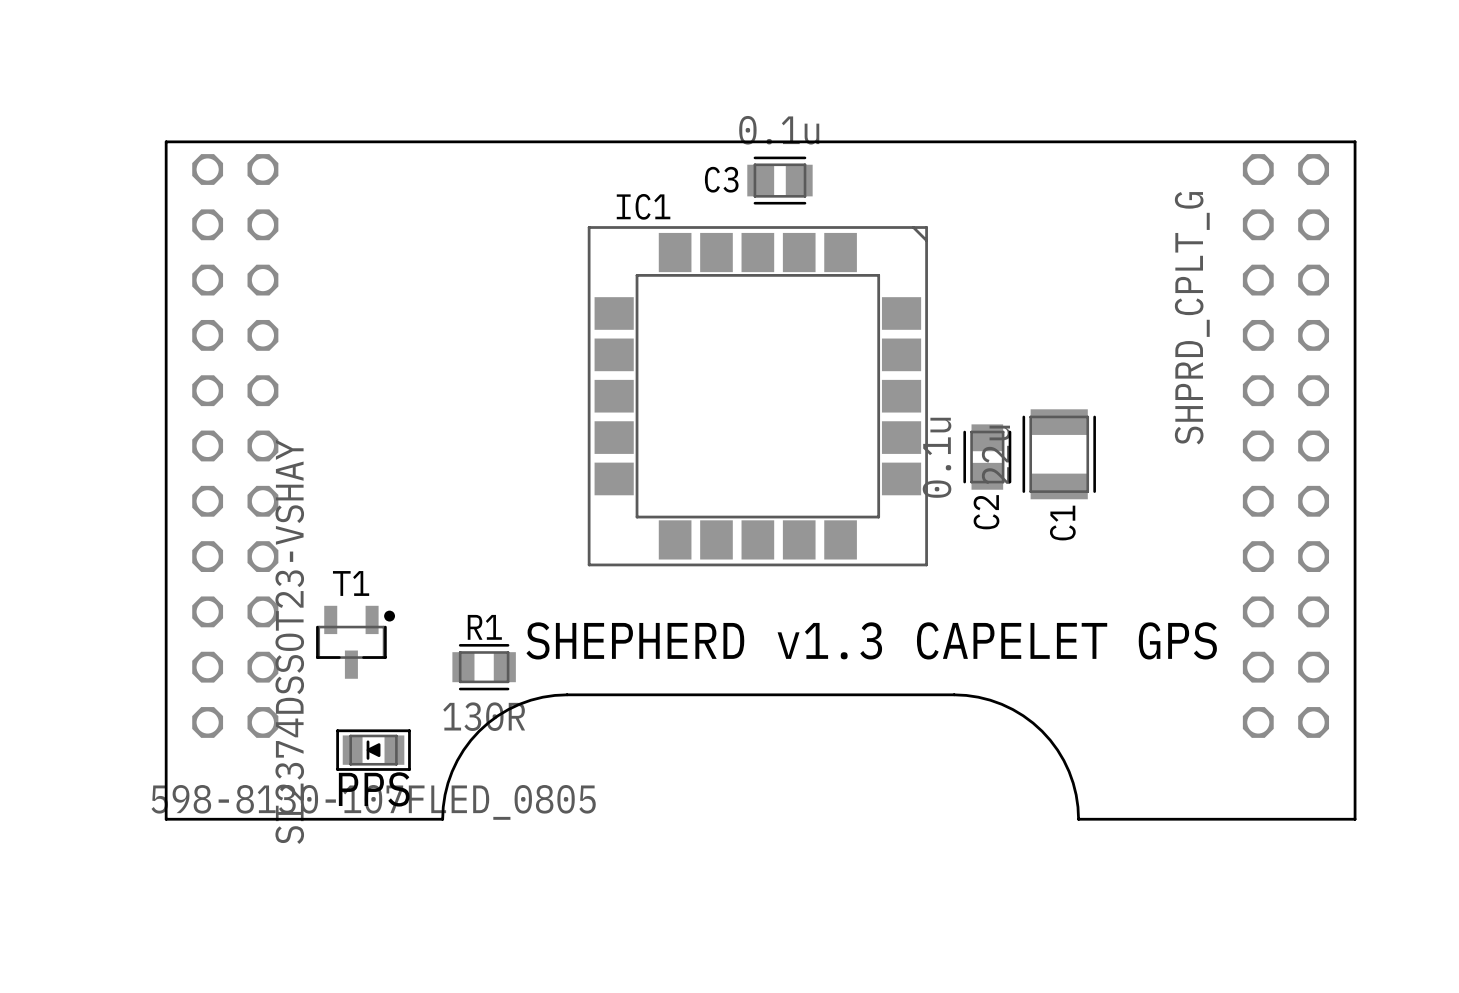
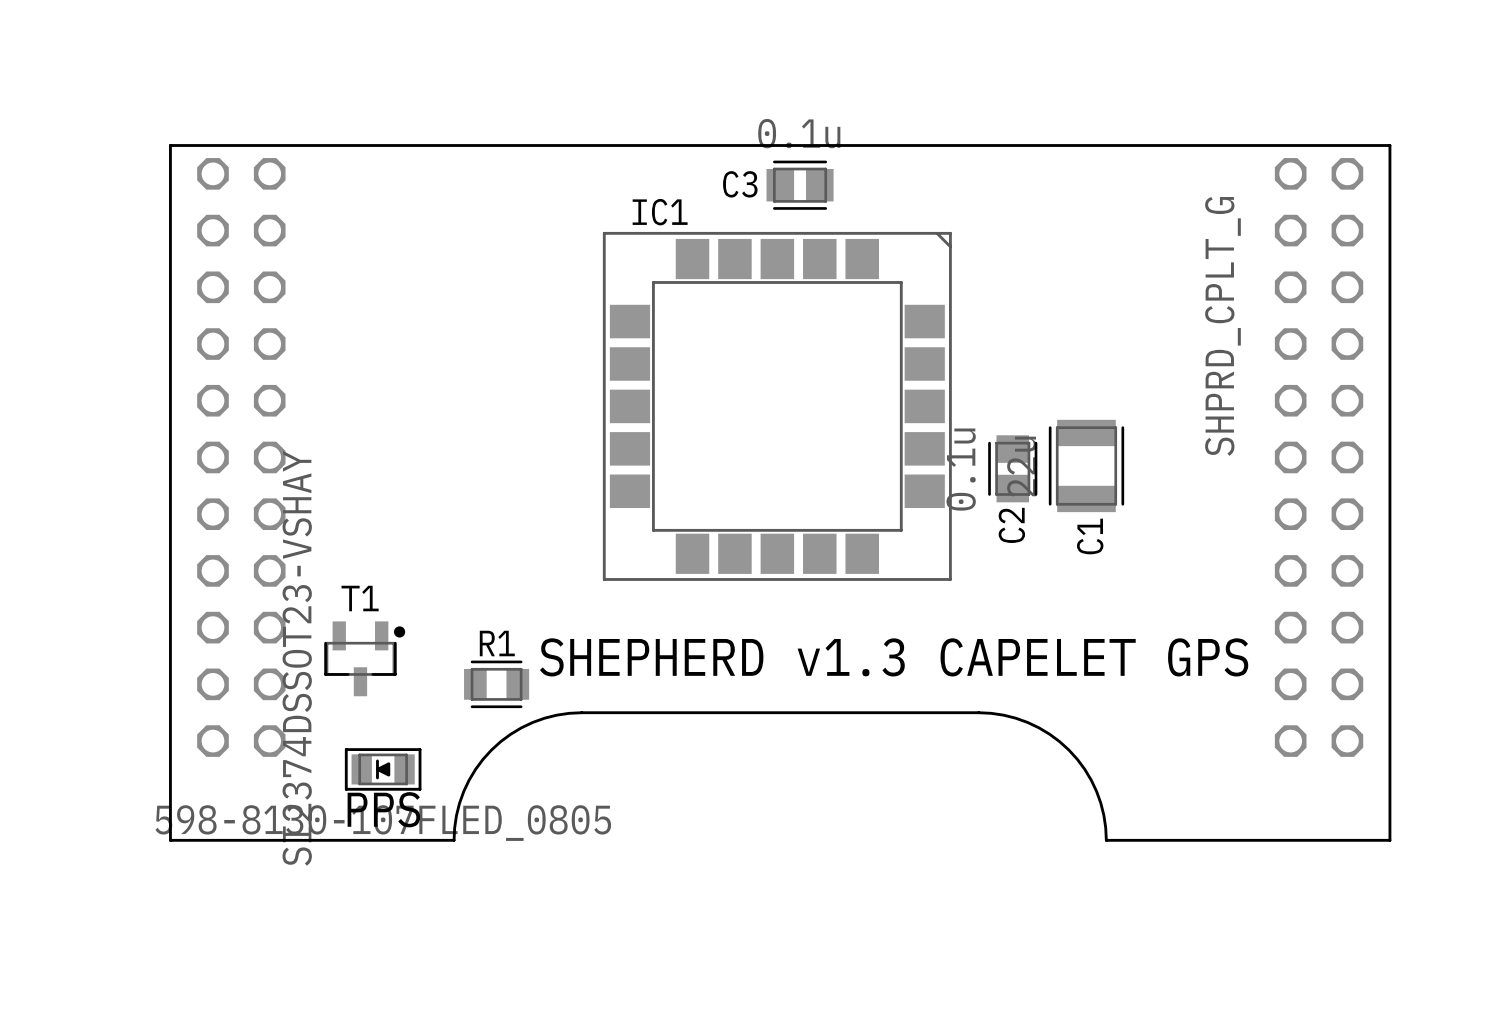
R1 value: 130R (484, 716) -> none

